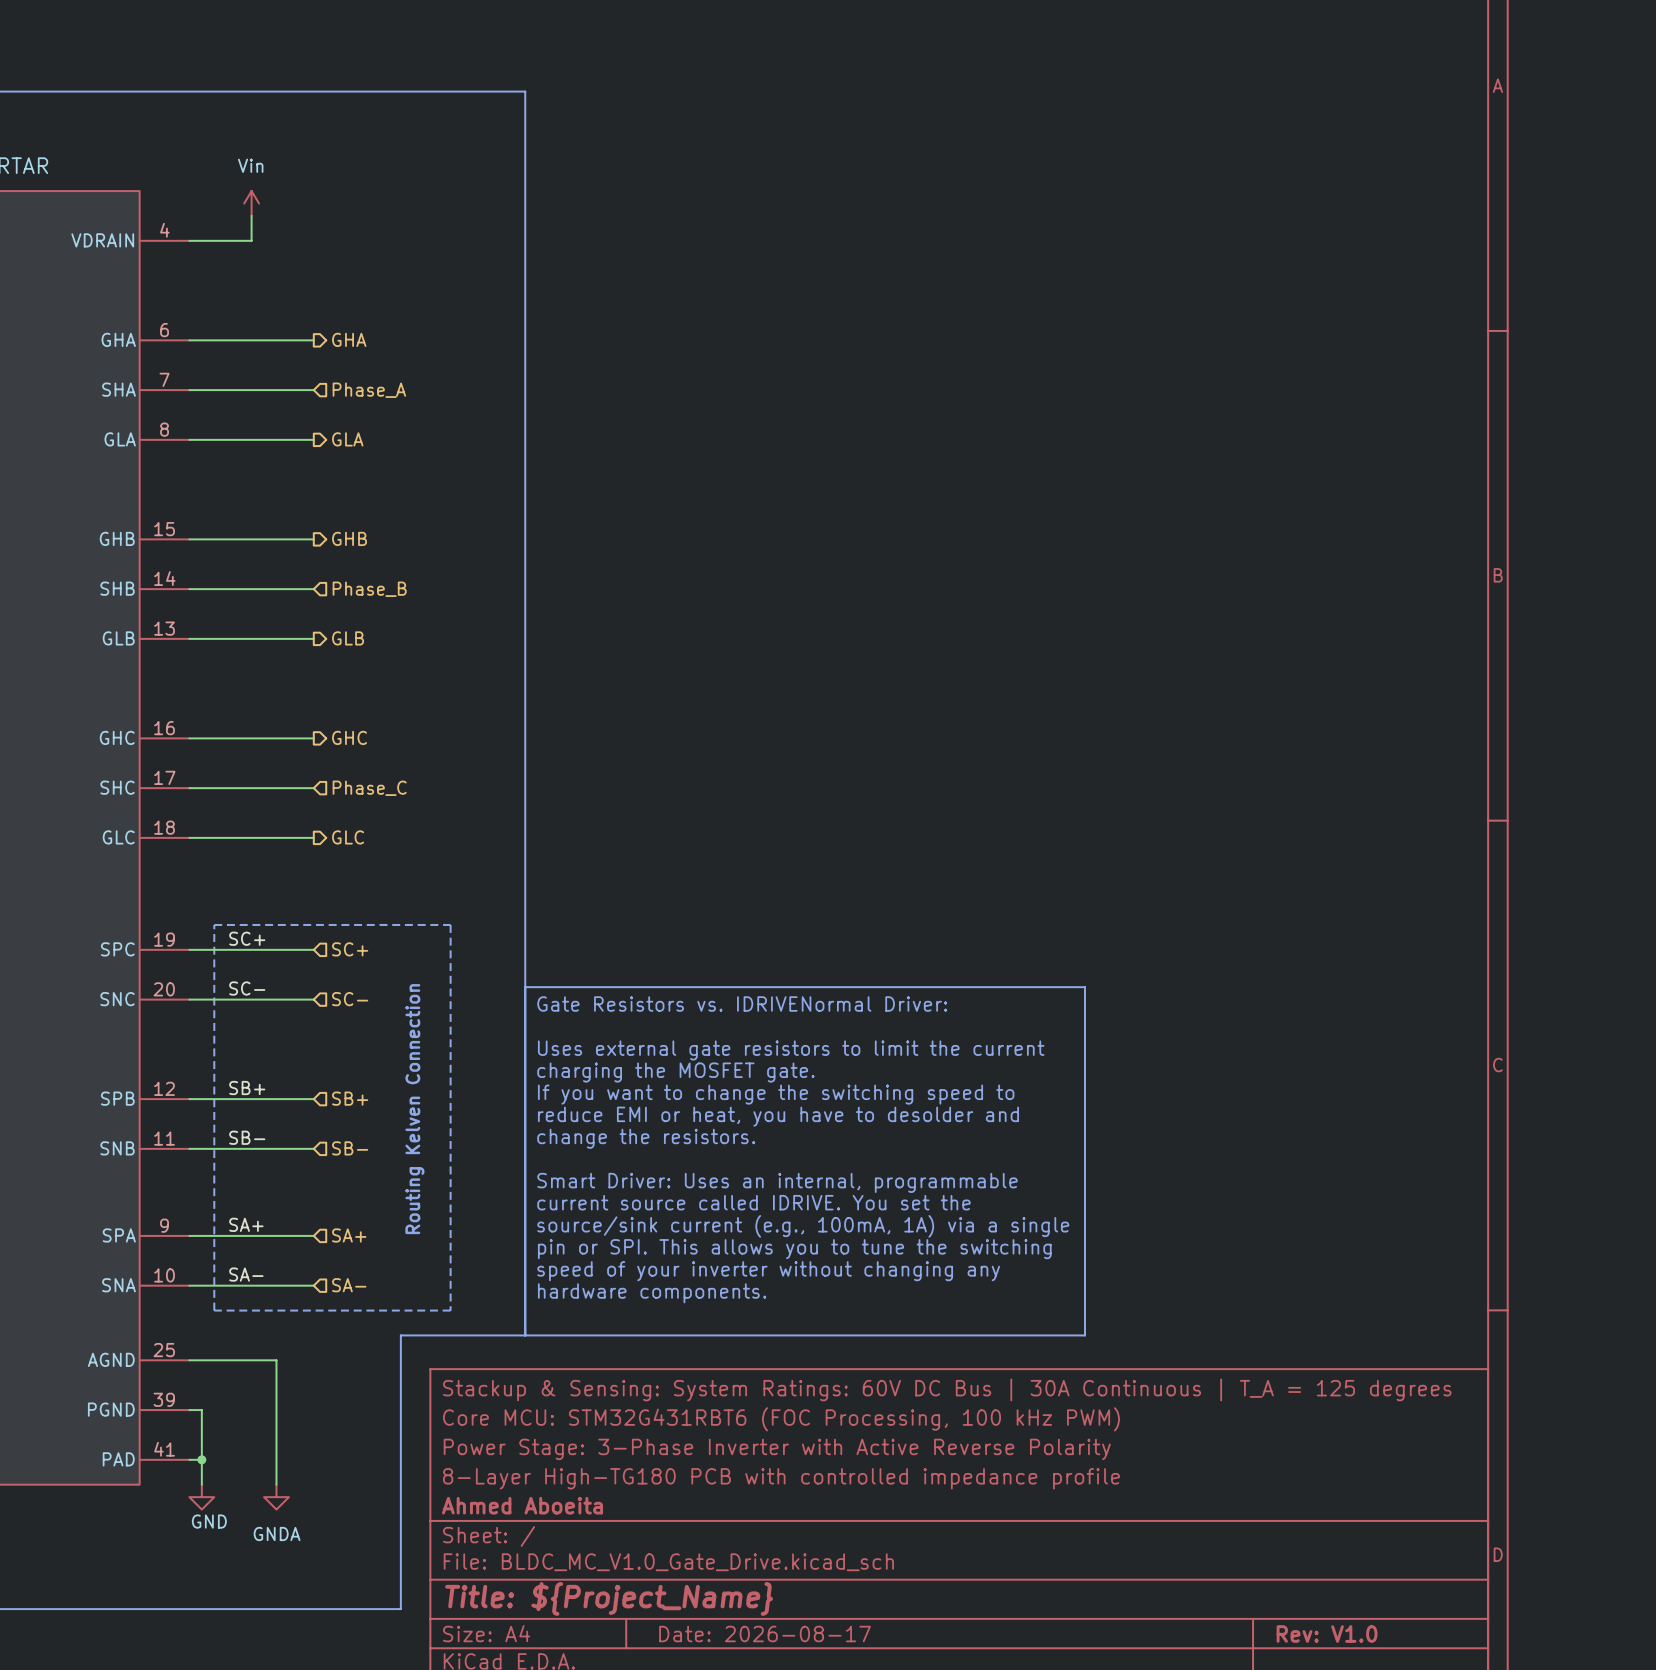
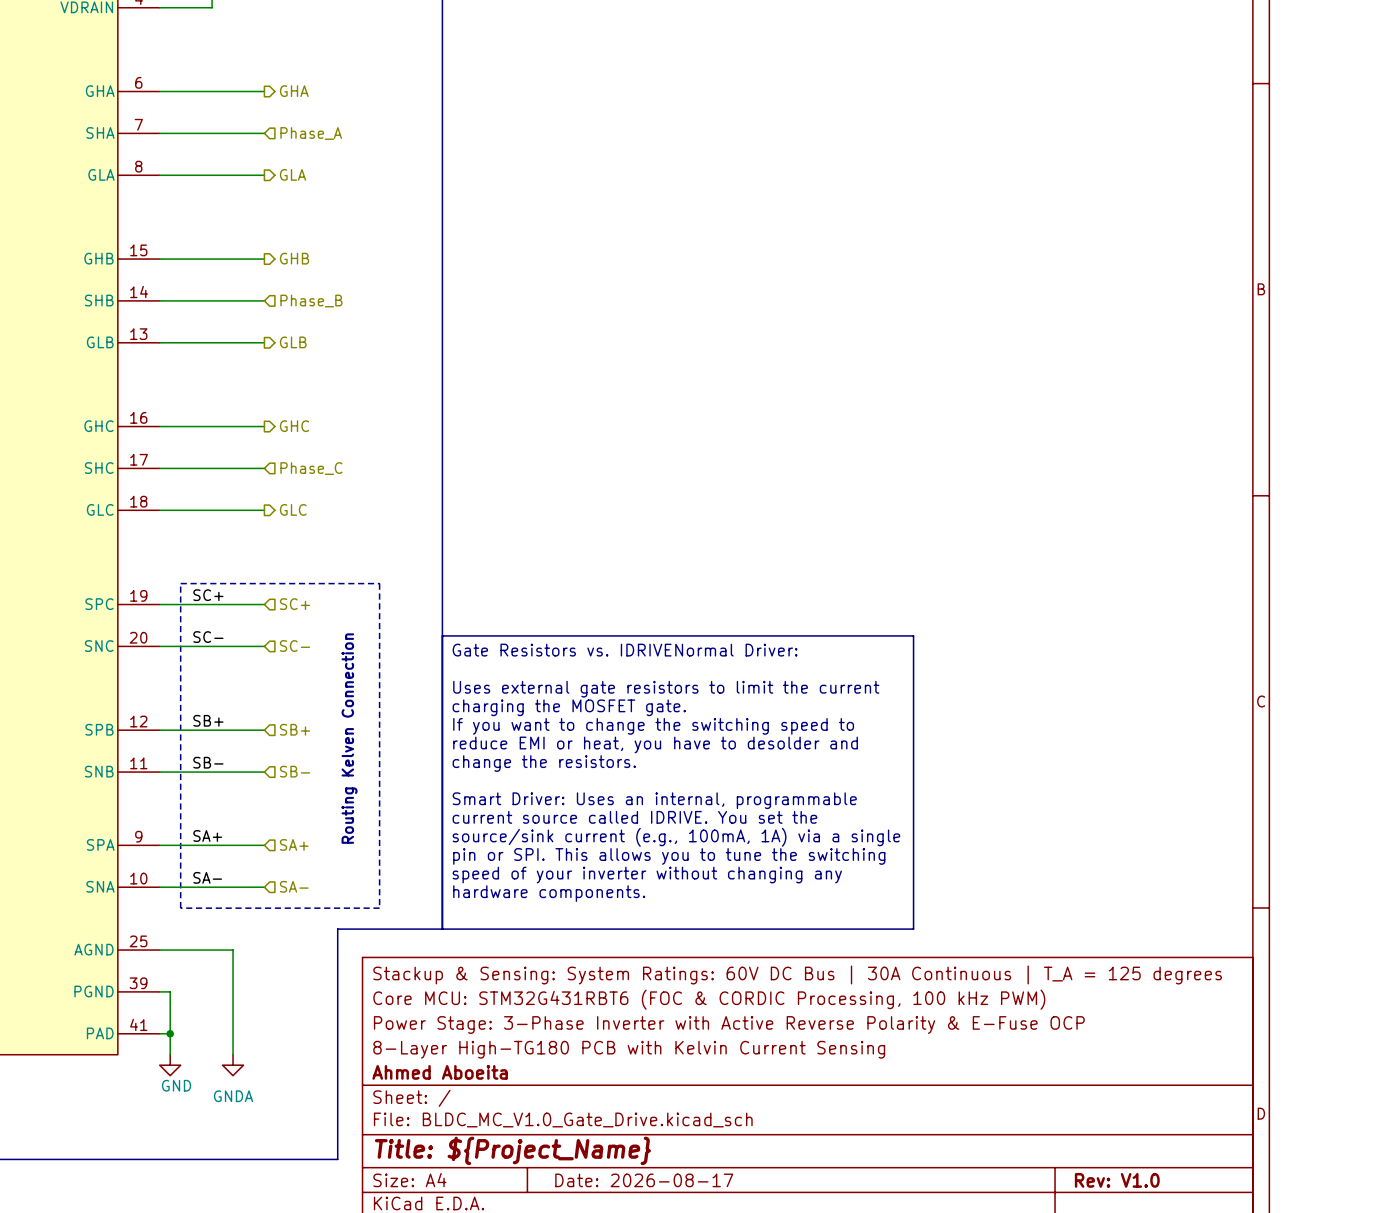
title block: Core MCU: STM32G431RBT6 (FOC Processing, 100 kHz PWM) (781, 1419) -> Core MCU: STM32G431RBT6 (FOC & CORDIC Processing, 100 kHz PWM) (709, 999)
title block: Power Stage: 3-Phase Inverter with Active Reverse Polarity (777, 1449) -> Power Stage: 3-Phase Inverter with Active Reverse Polarity & E-Fuse OCP (729, 1025)
title block: 8-Layer High-TG180 PCB with controlled impedance profile (781, 1478) -> 8-Layer High-TG180 PCB with Kelvin Current Sensing (629, 1049)

